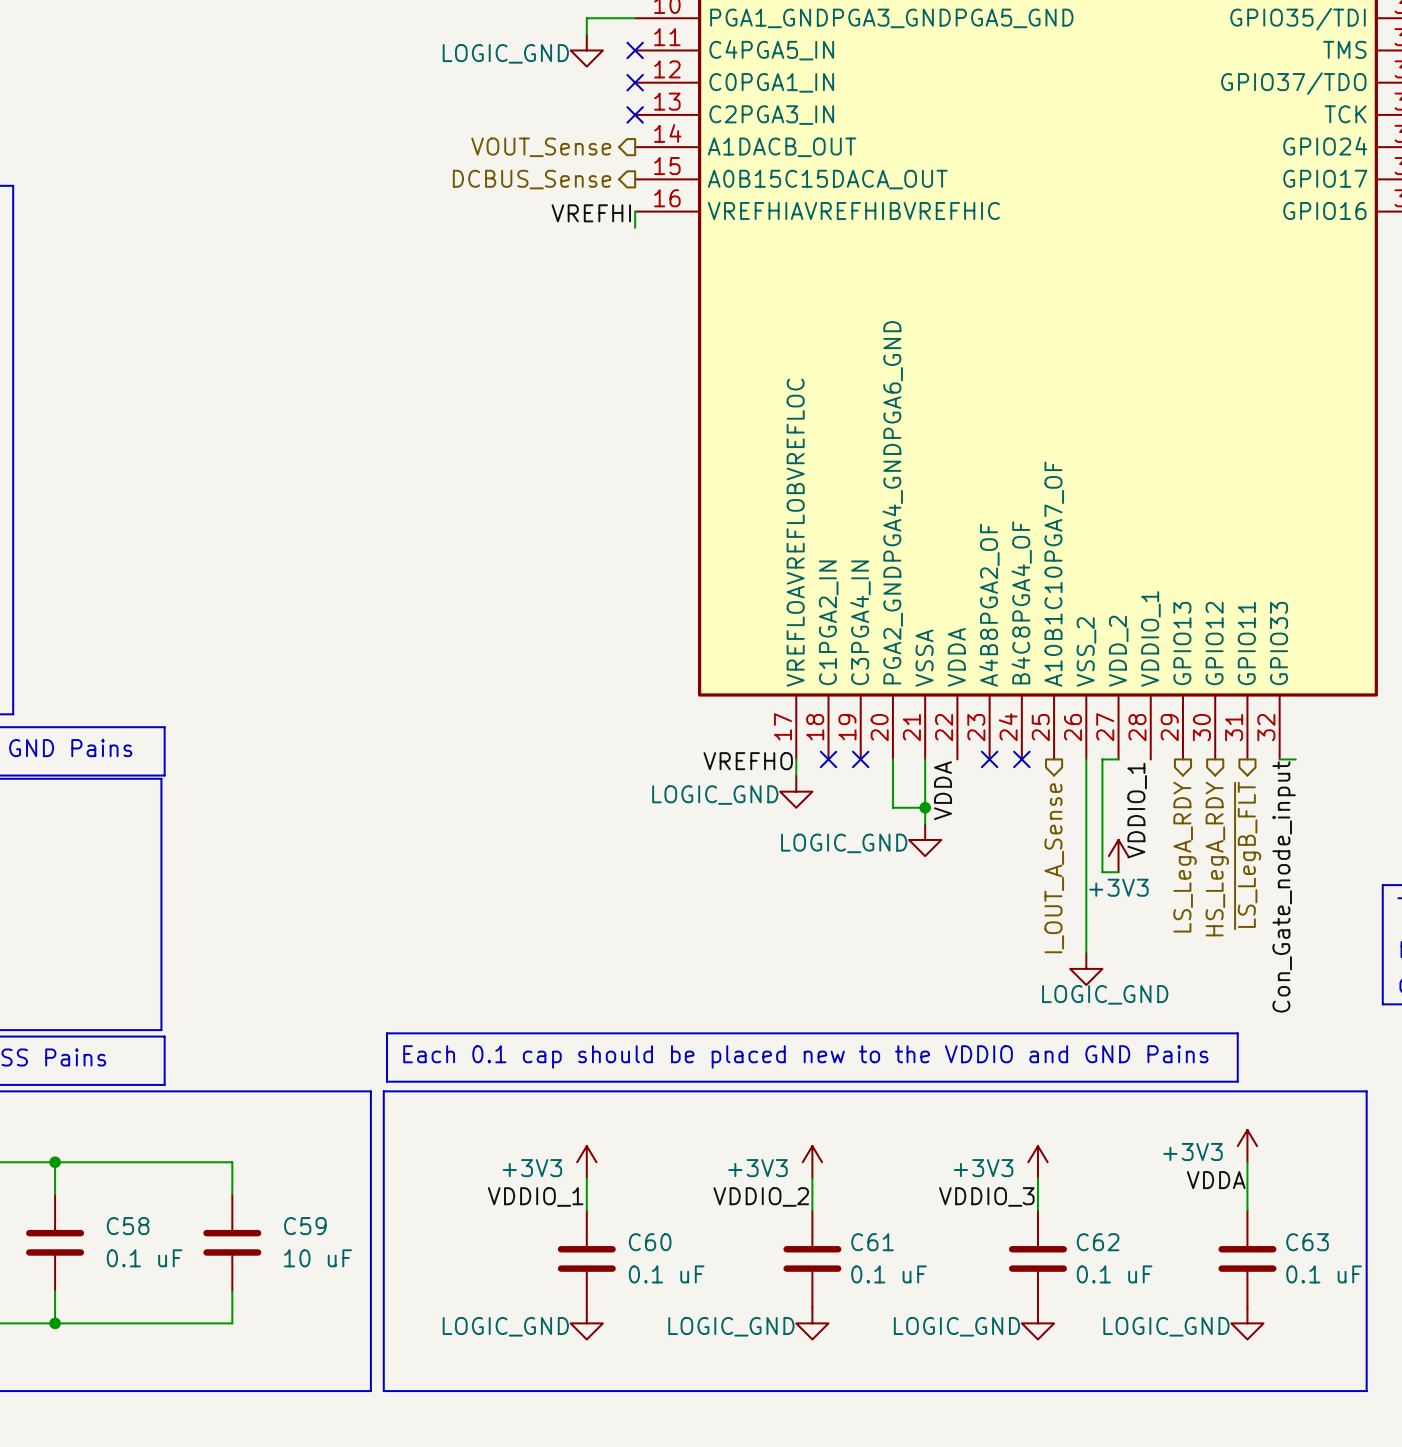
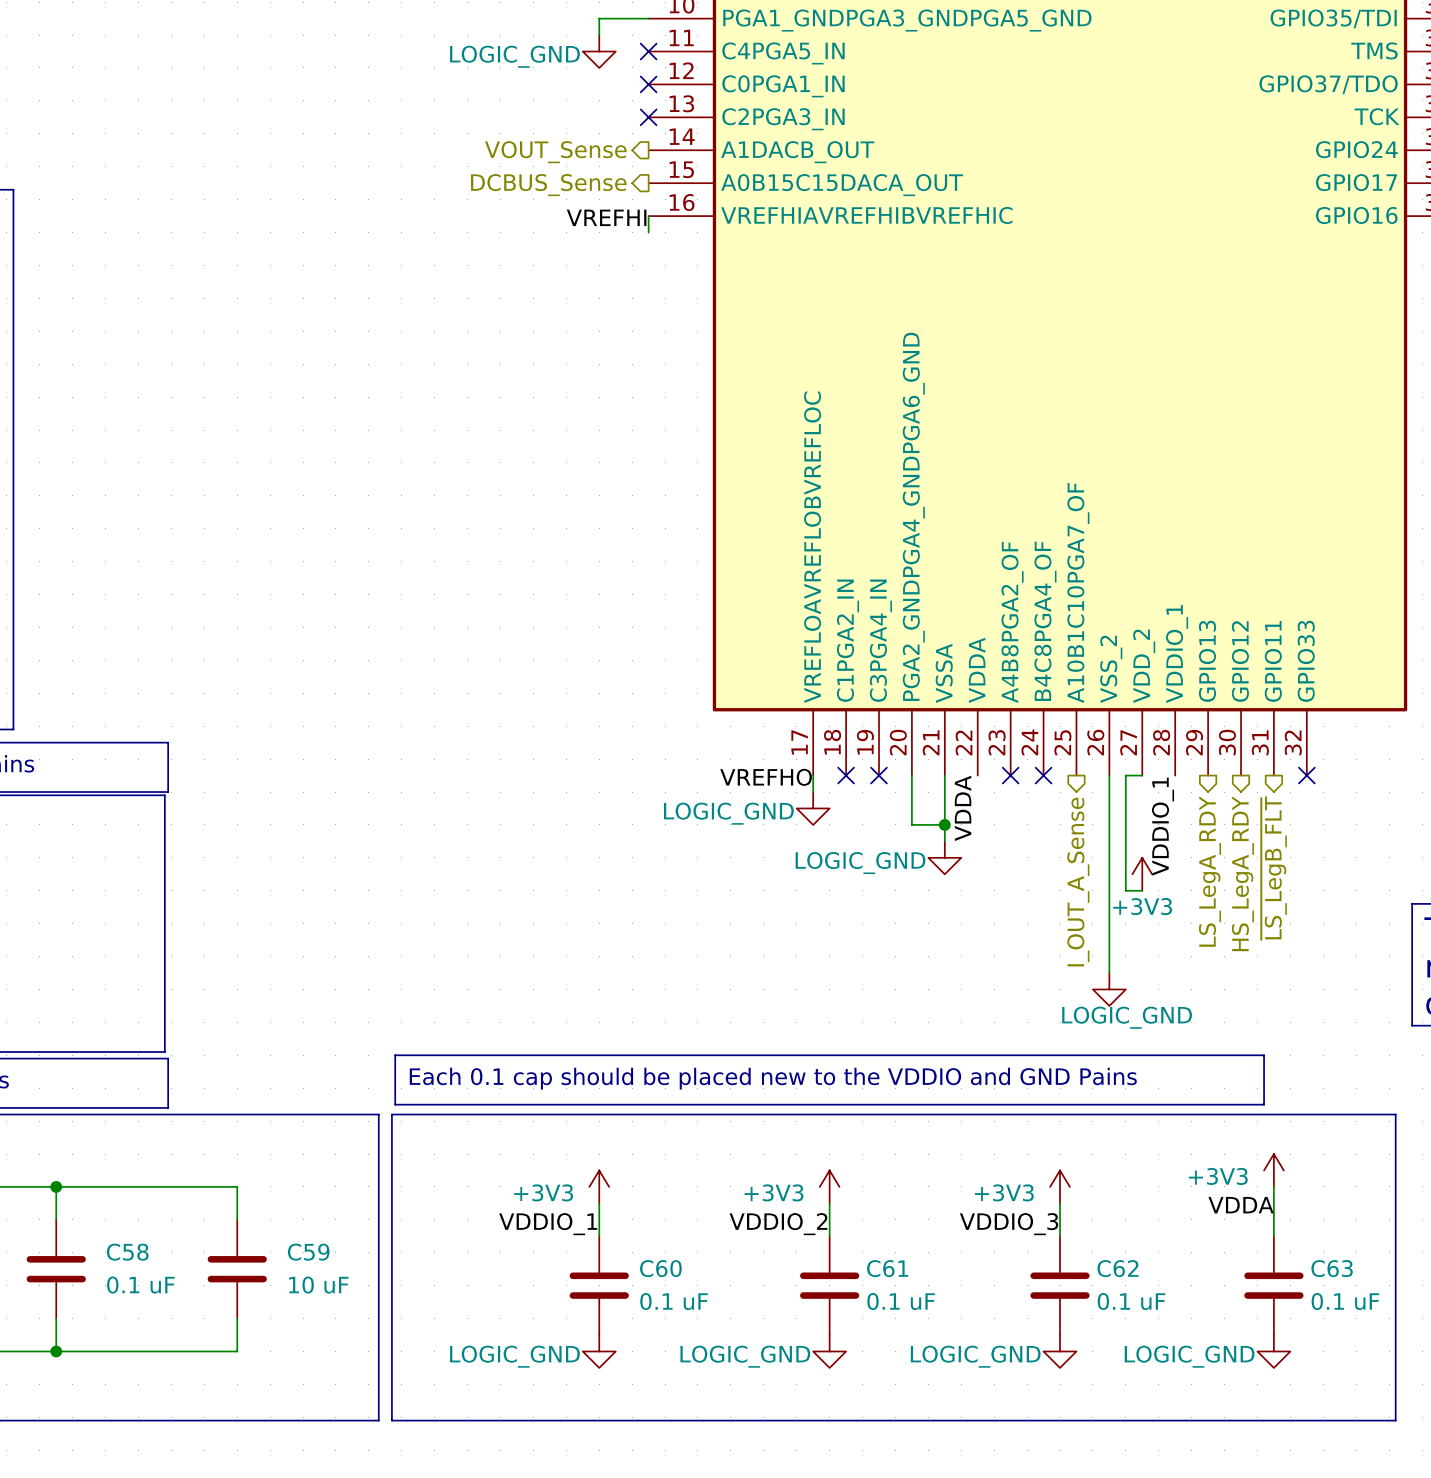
wire: (1279, 759) (1295, 759) -> none
no-connect mark: none -> (1306, 775)
label: Con_Gate_node_input (1284, 886) -> none

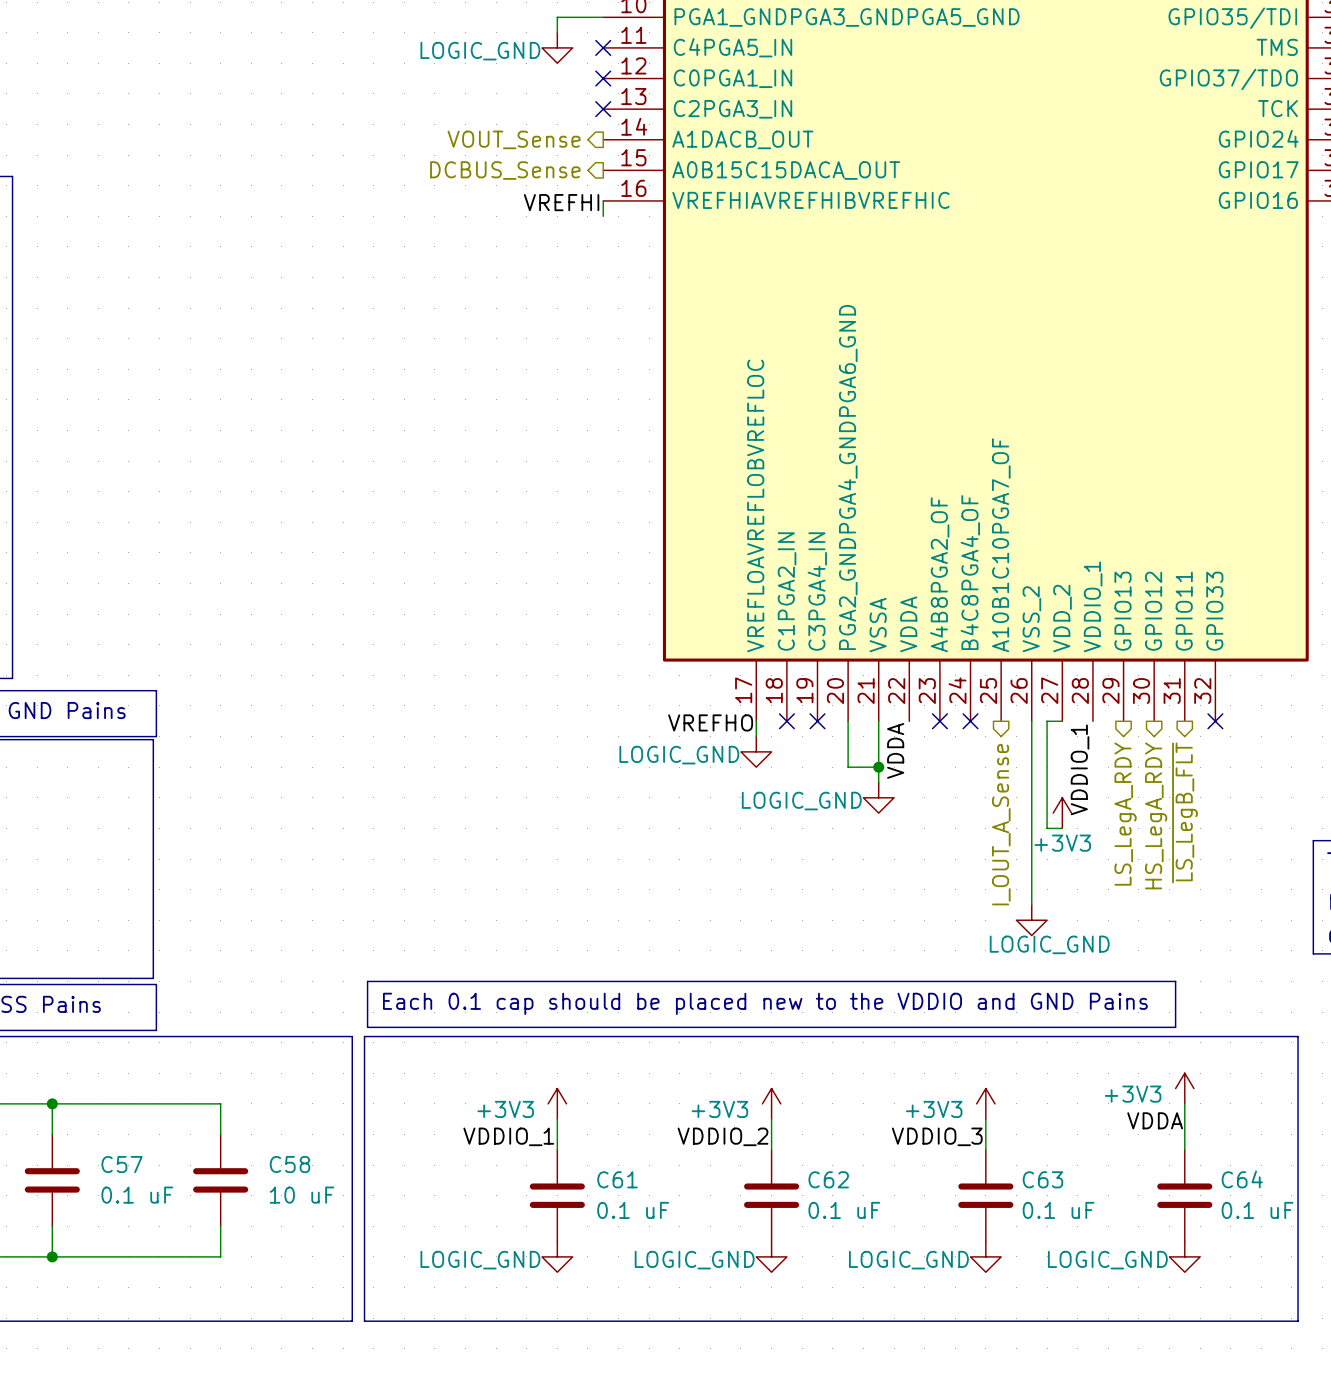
C58 name: C58 (127, 1252) -> C57 (122, 1164)
C59 name: C59 (308, 1252) -> C58 (290, 1164)
C60 name: C60 (660, 1268) -> C61 (617, 1179)
C61 name: C61 (887, 1268) -> C62 (828, 1179)
C62 name: C62 (1117, 1268) -> C63 (1042, 1179)
C63 name: C63 (1332, 1268) -> C64 (1242, 1179)

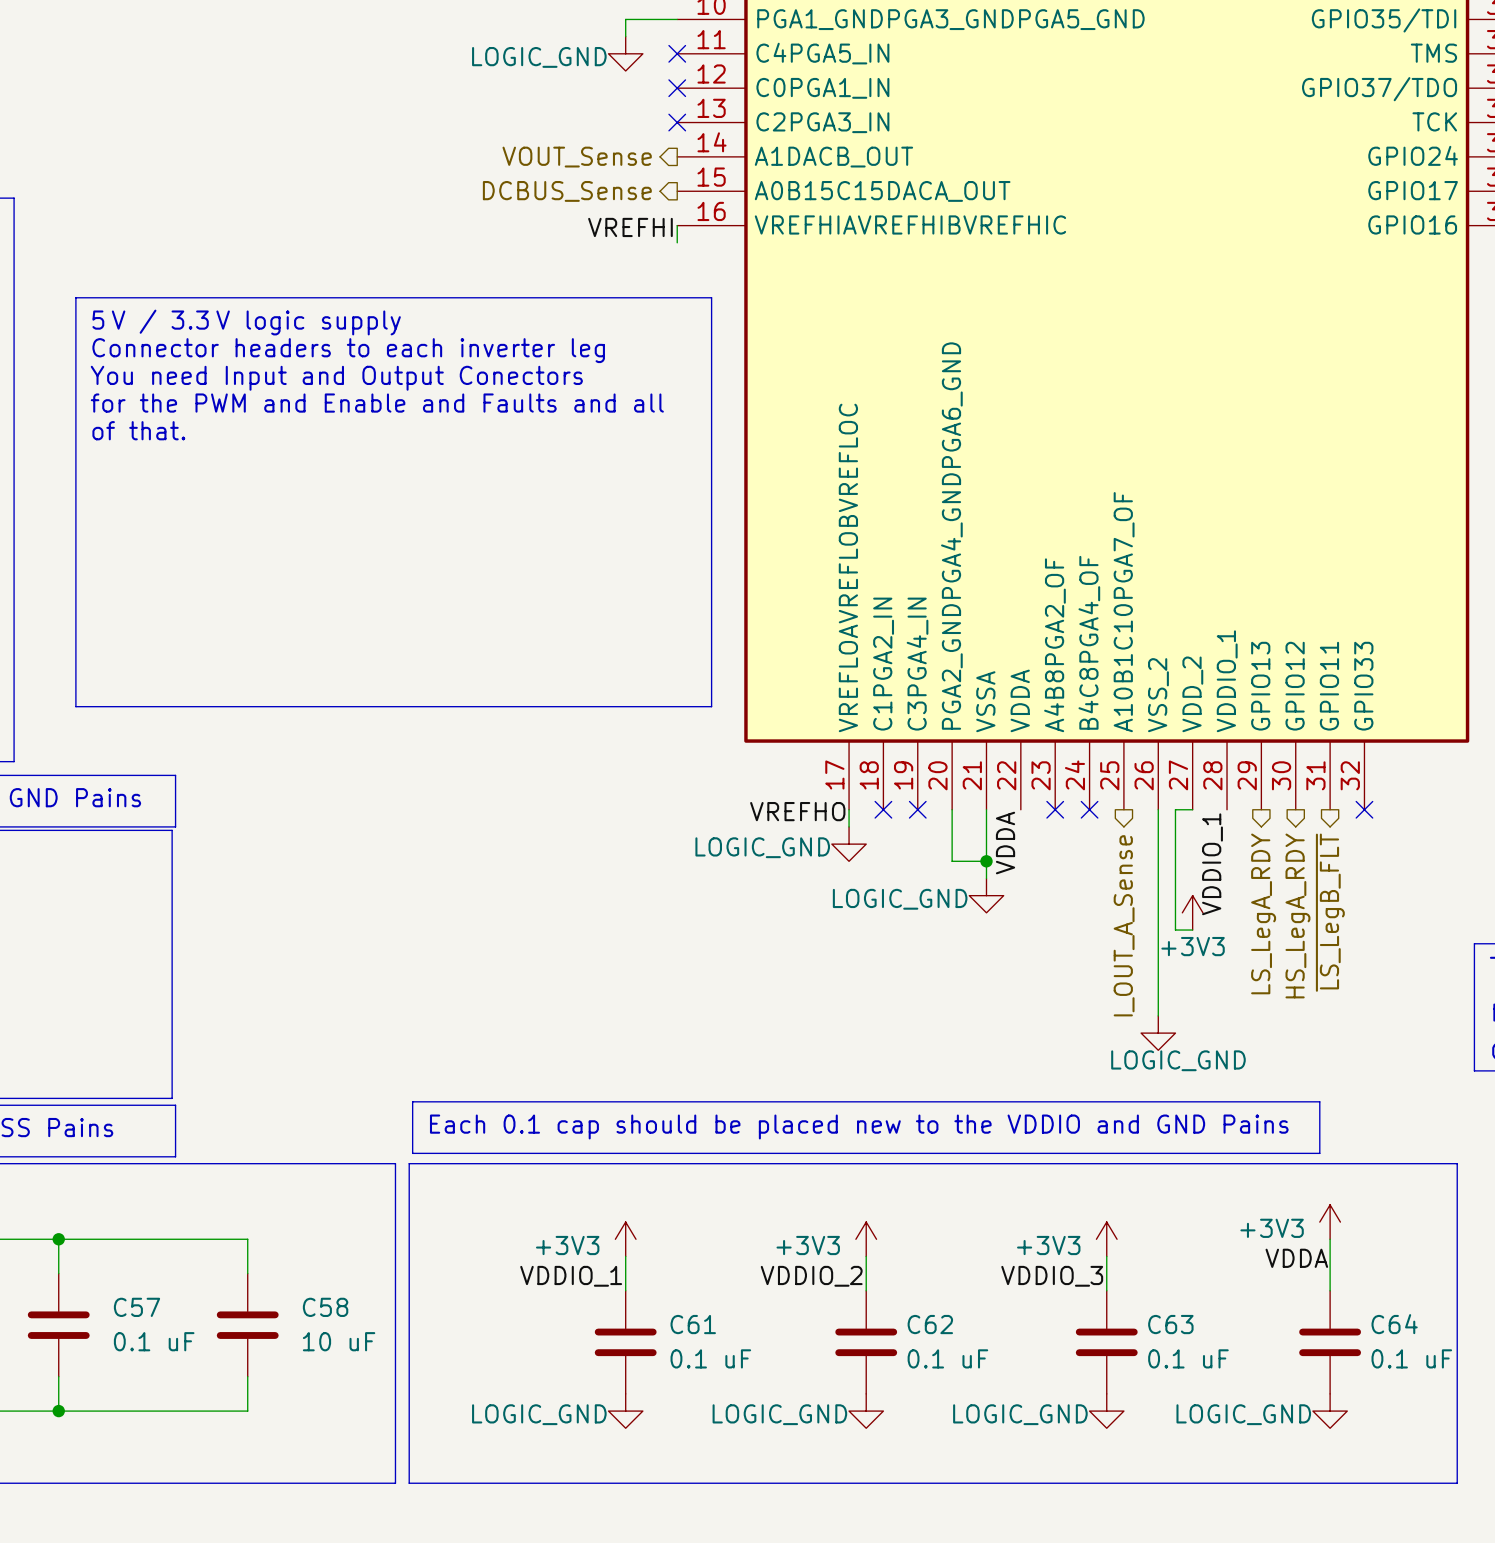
line: none -> (75, 297) (711, 297) (711, 706) (75, 706) (75, 297)
text: none -> 5 V / 3.3 V logic supply (246, 322)
text: none -> Connector headers to each inverter leg (348, 350)
text: none -> You need Input and Output Conectors (336, 378)
text: none -> for the PWM and Enable and Faults and all (377, 403)
text: none -> of that. (138, 430)

